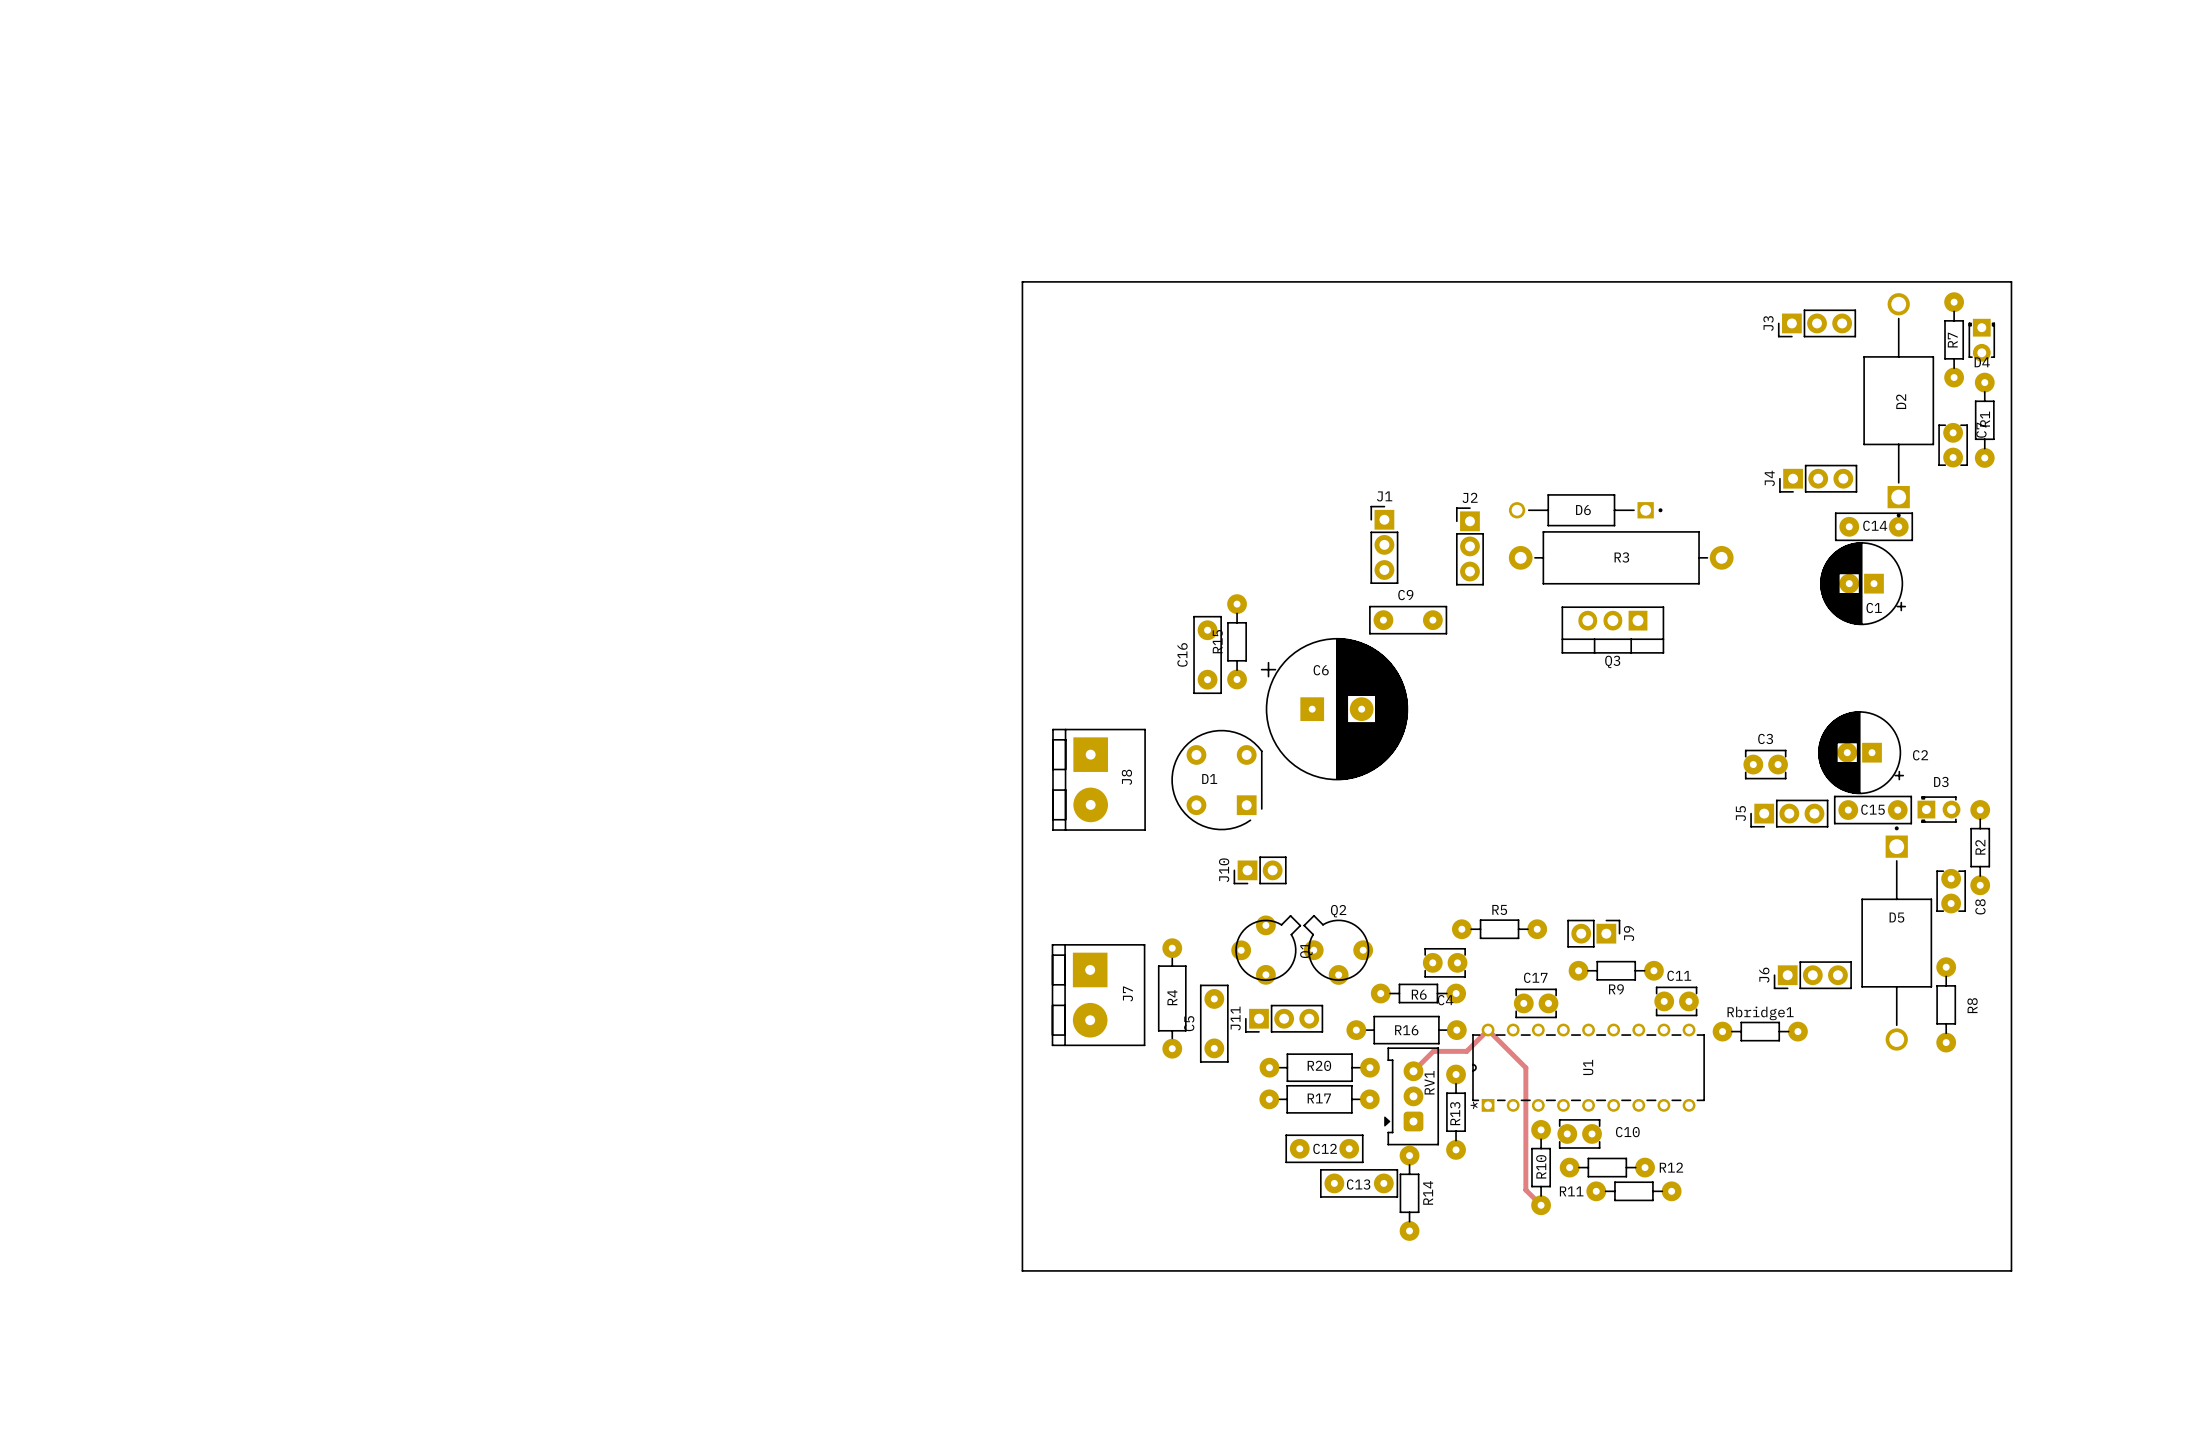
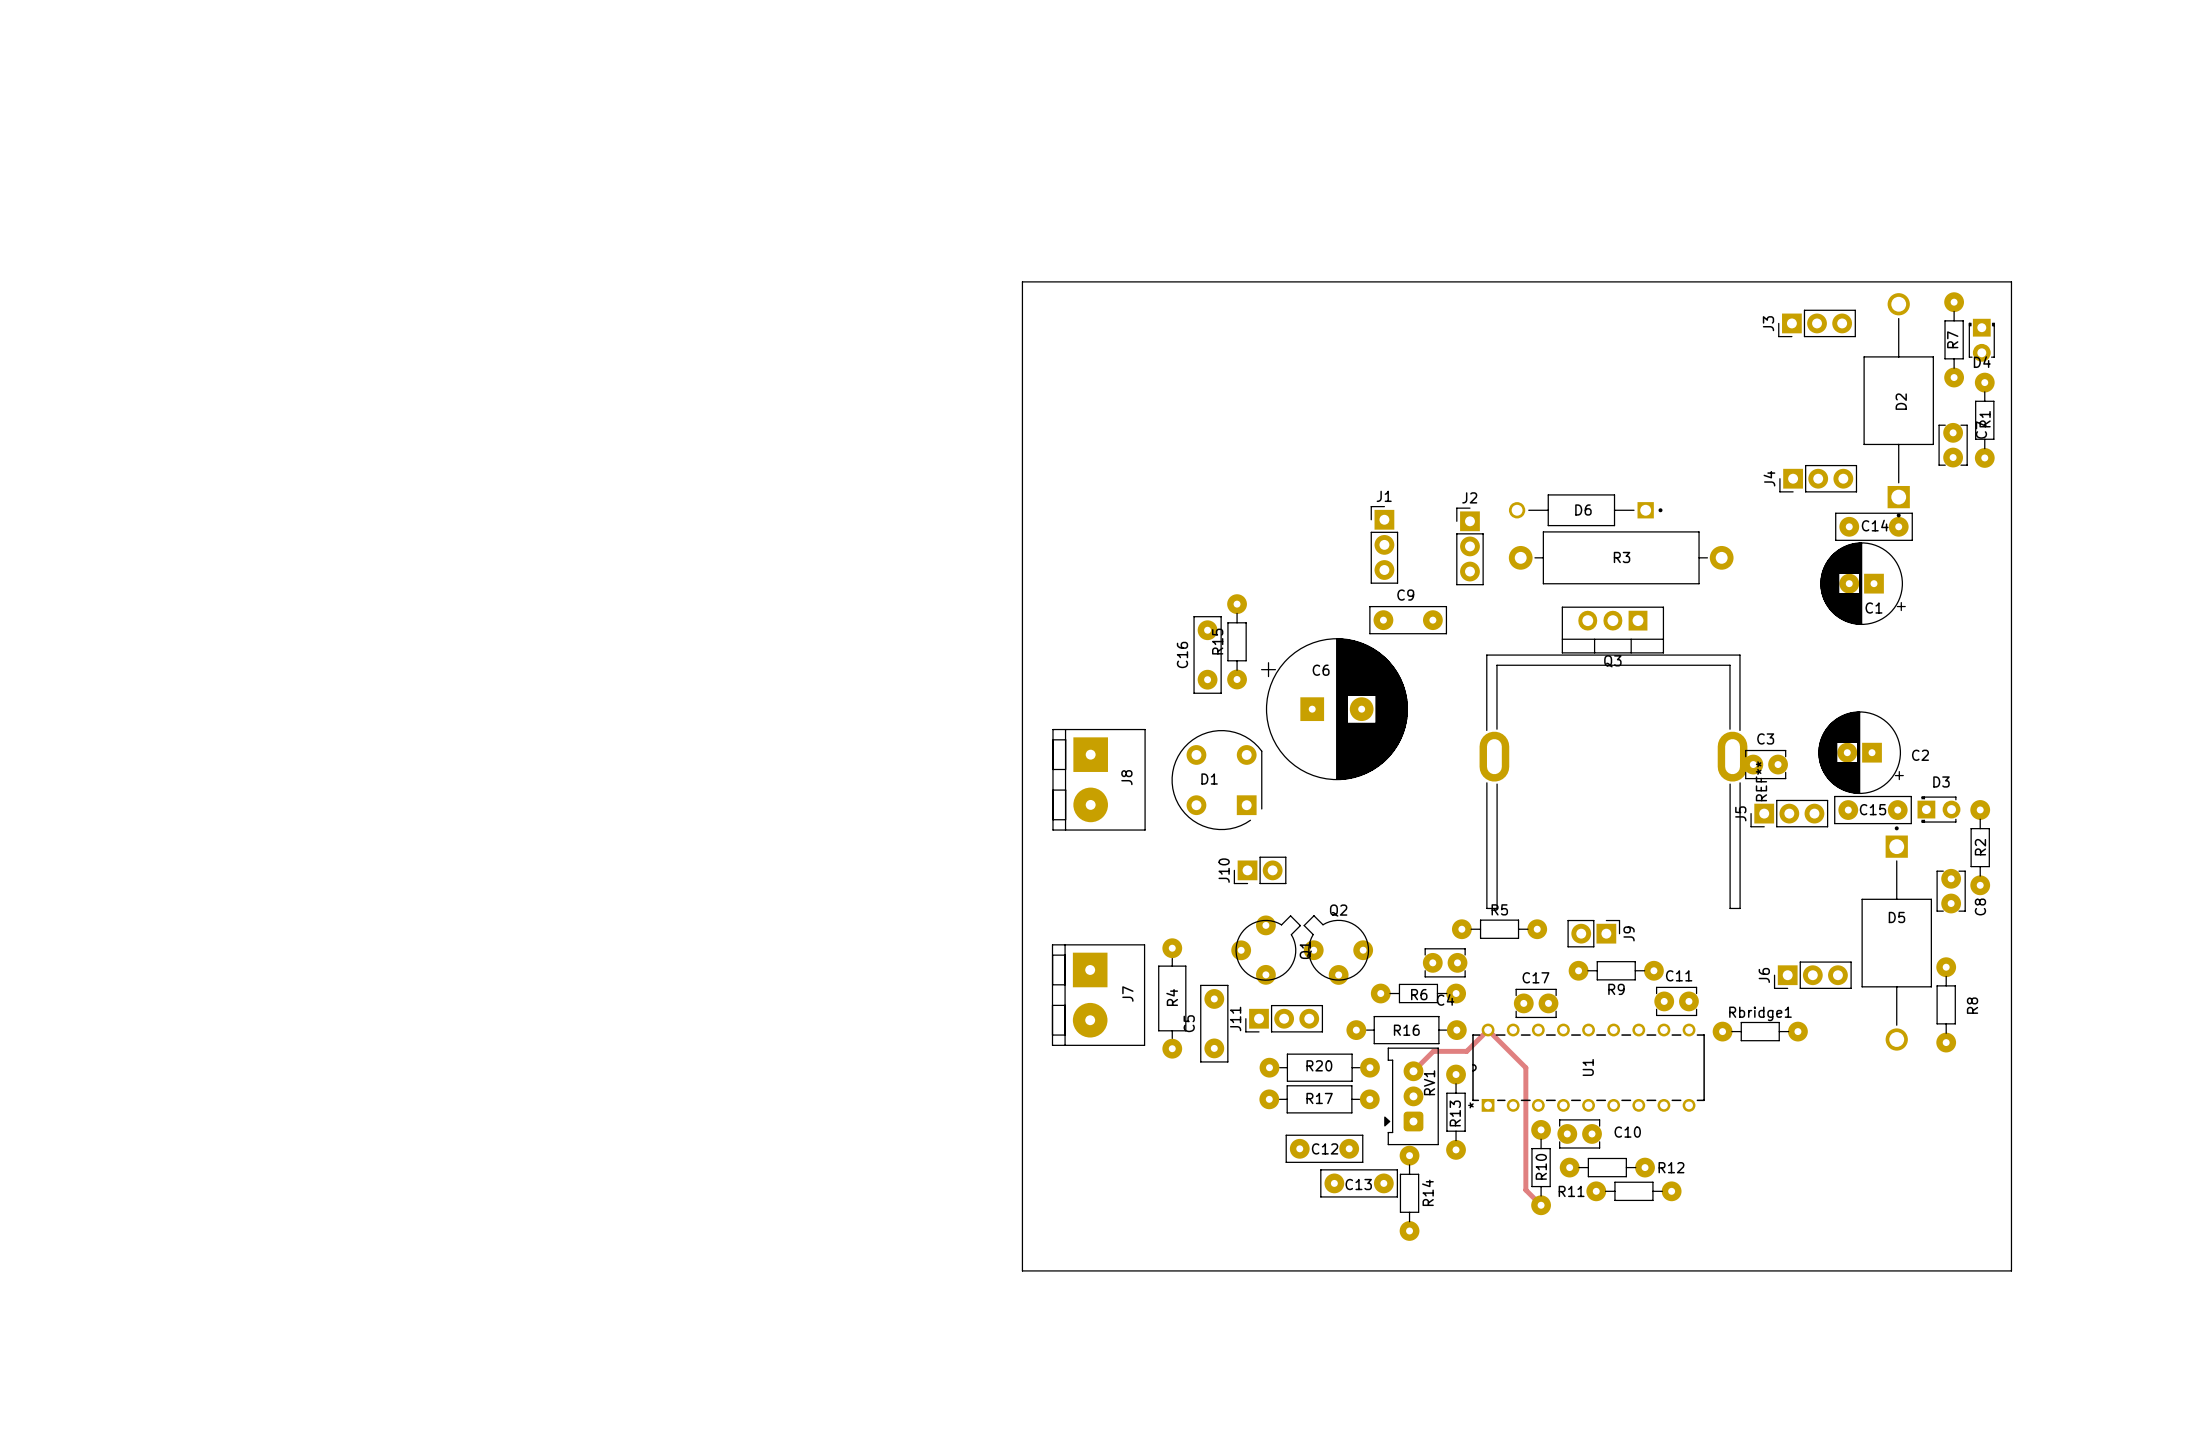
REF**: none -> (1613, 781)

